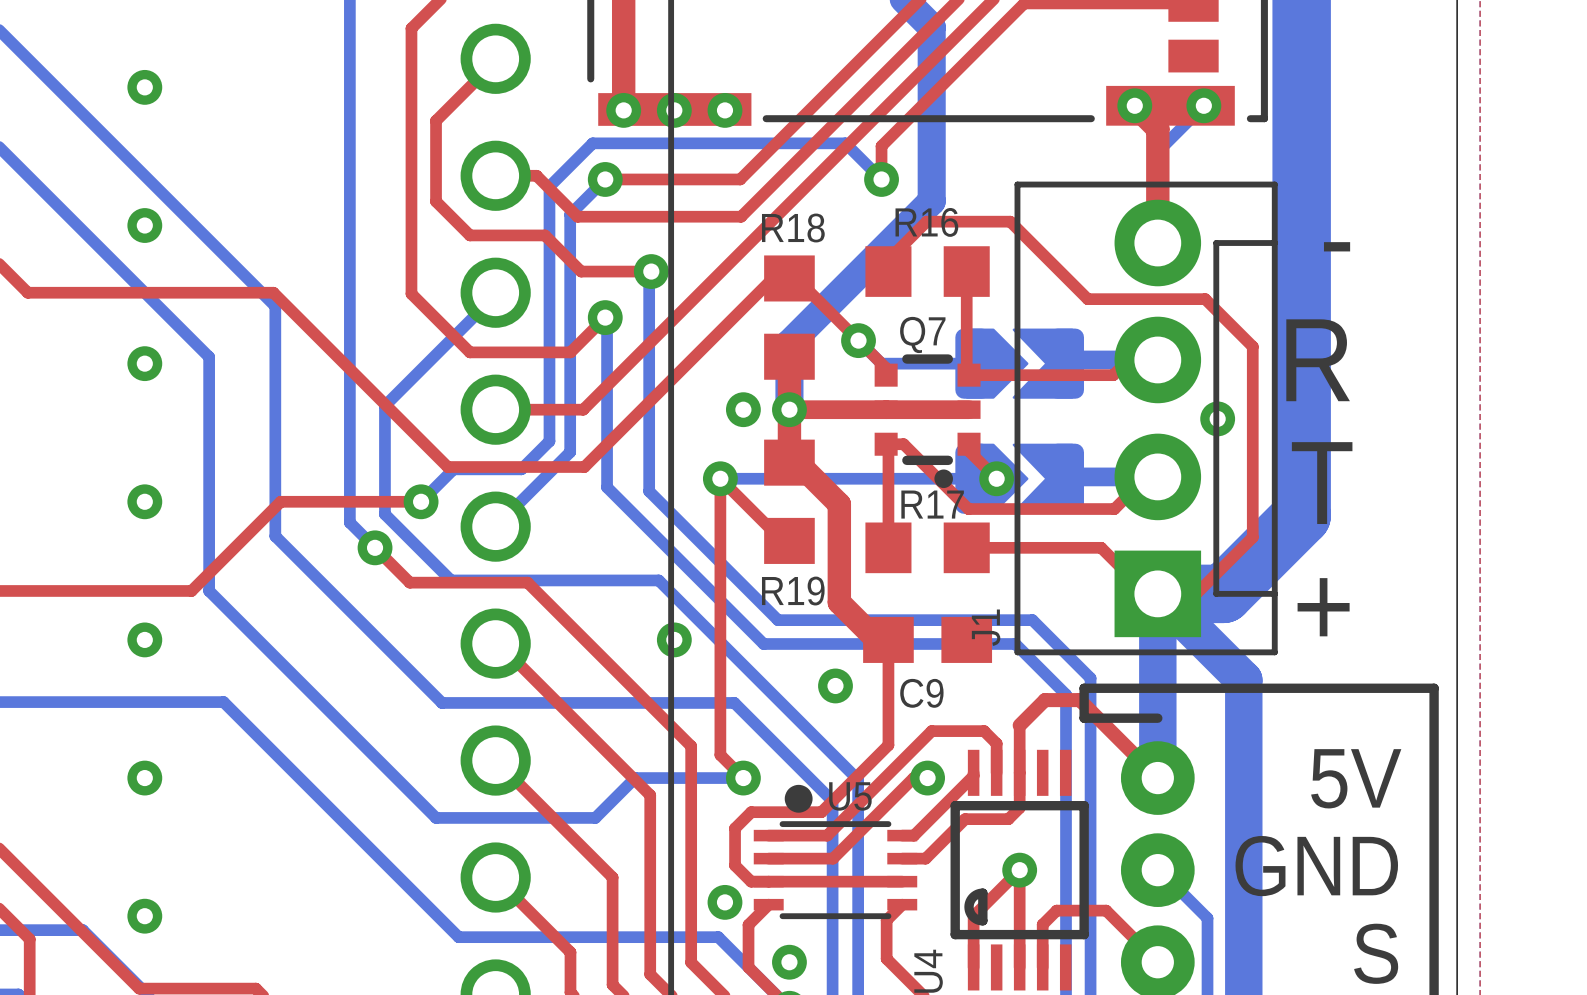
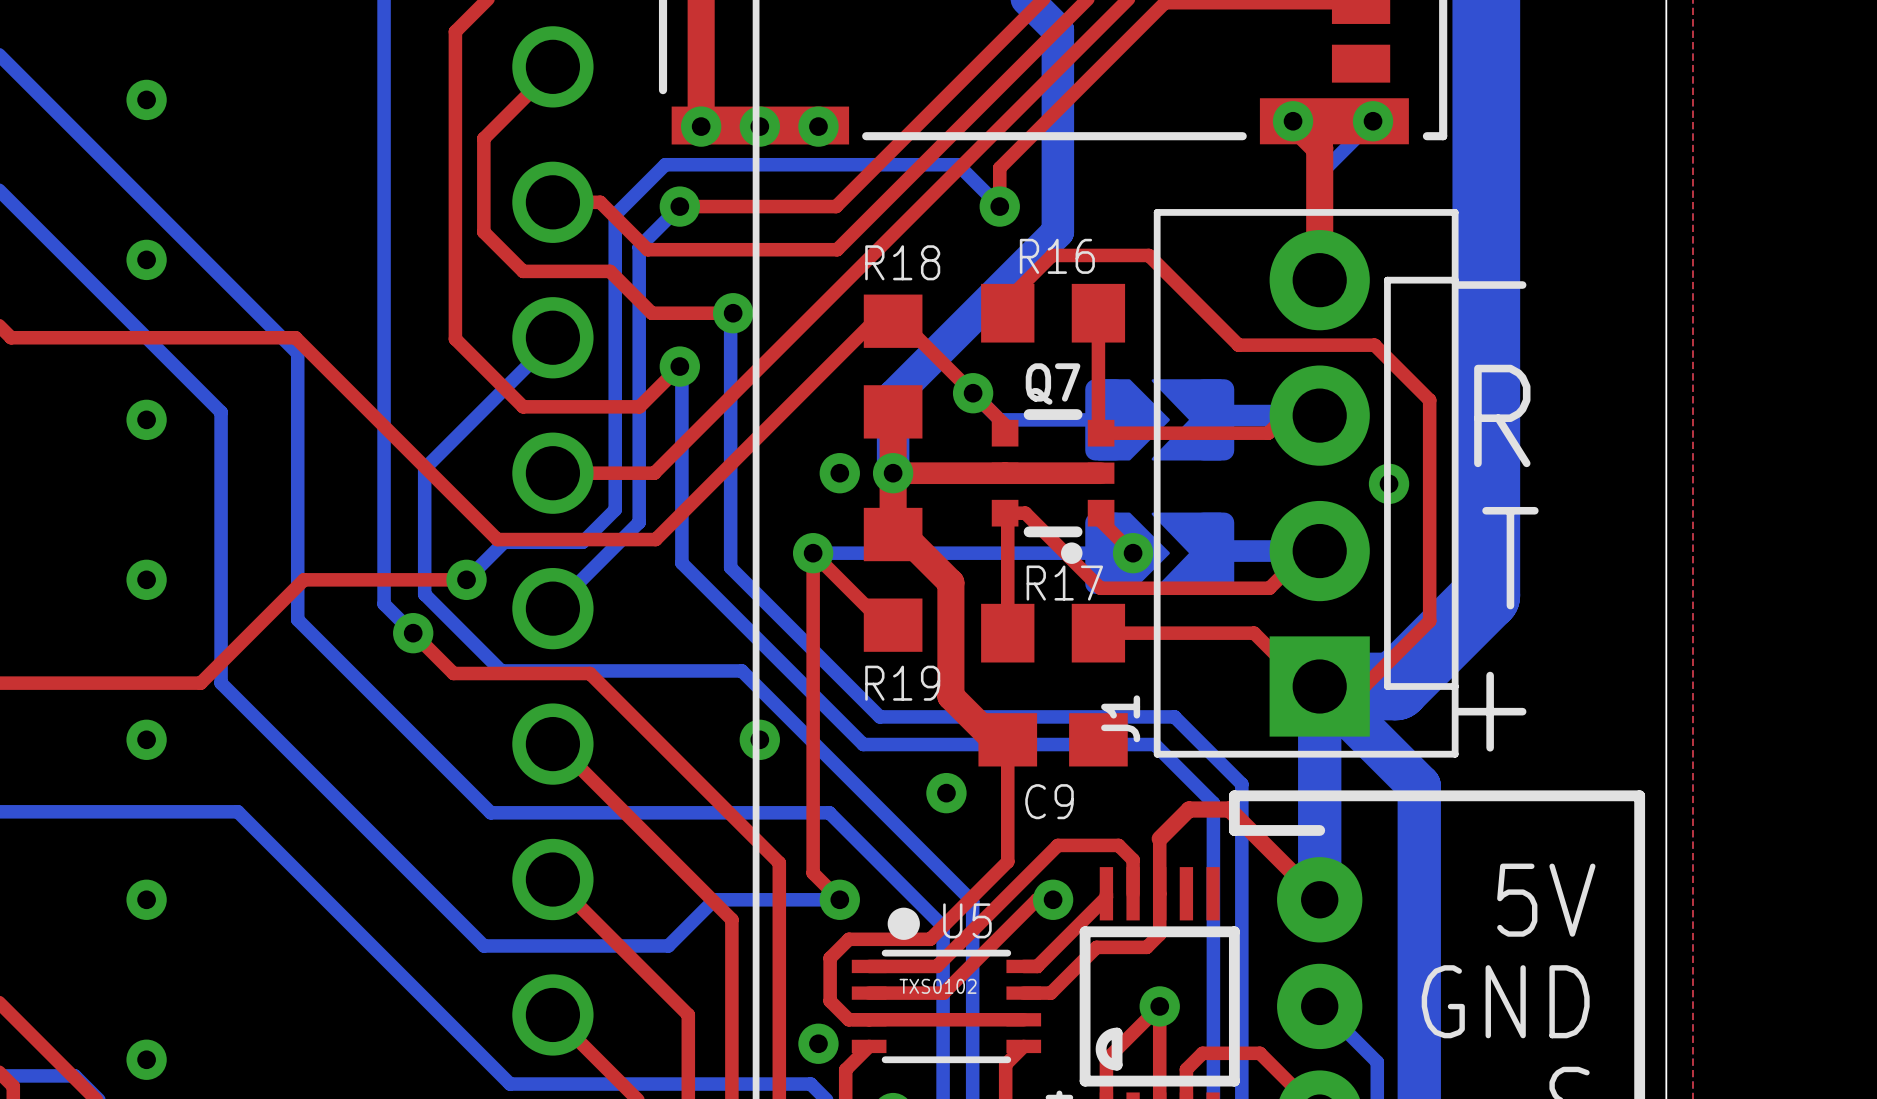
U5 value: none -> TXS0102 (938, 986)

